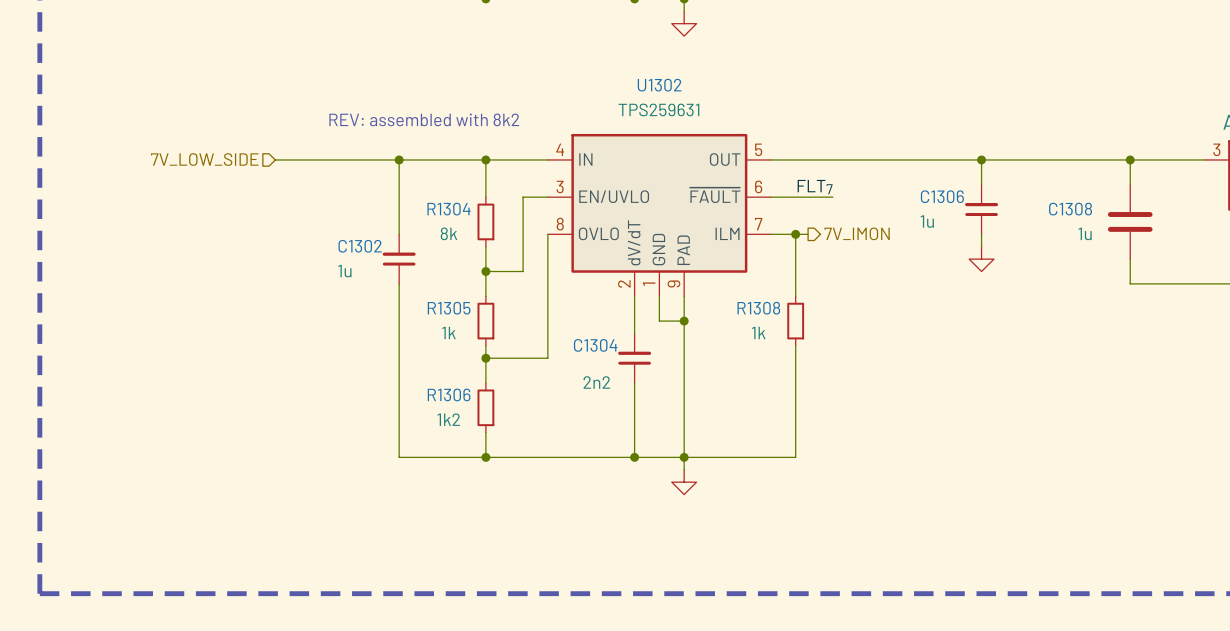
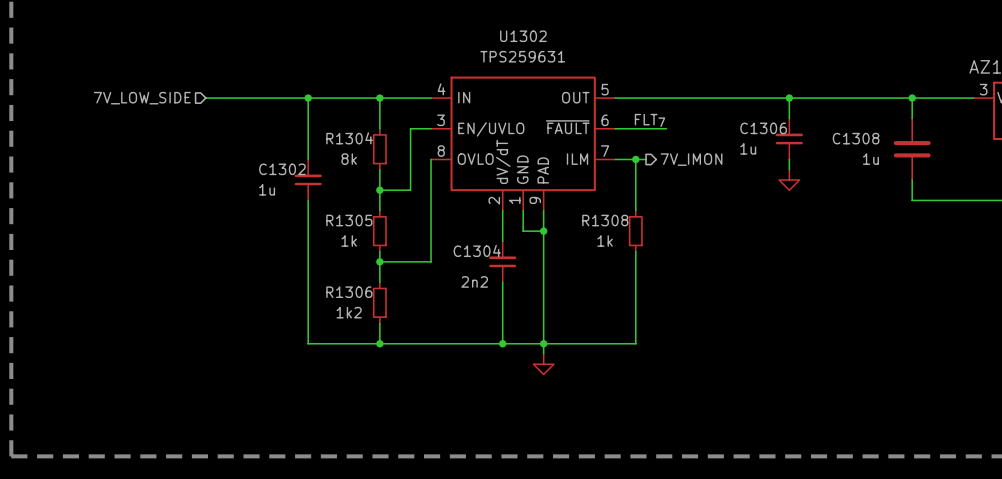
text: REV: assembled with 8k2 (424, 119) -> none

